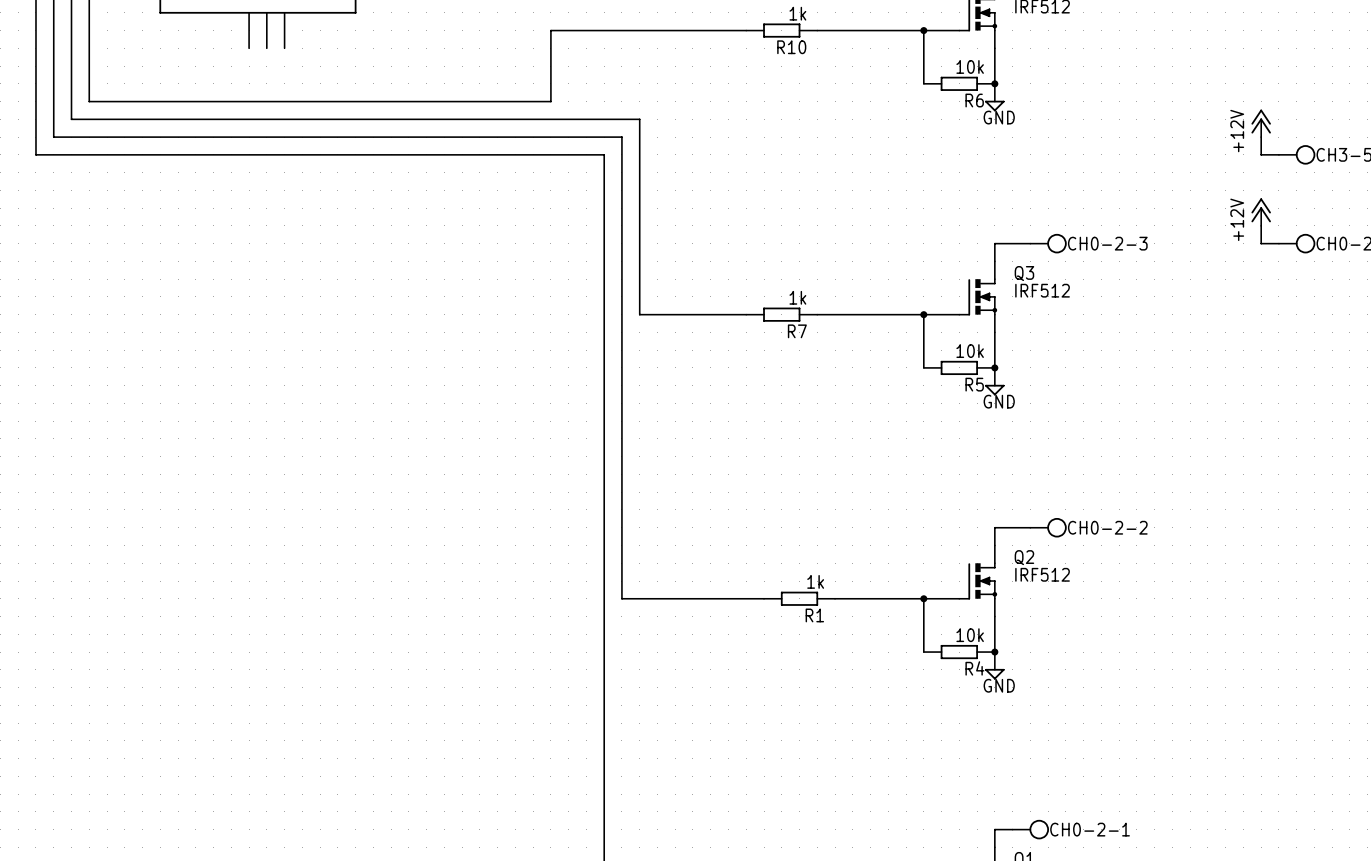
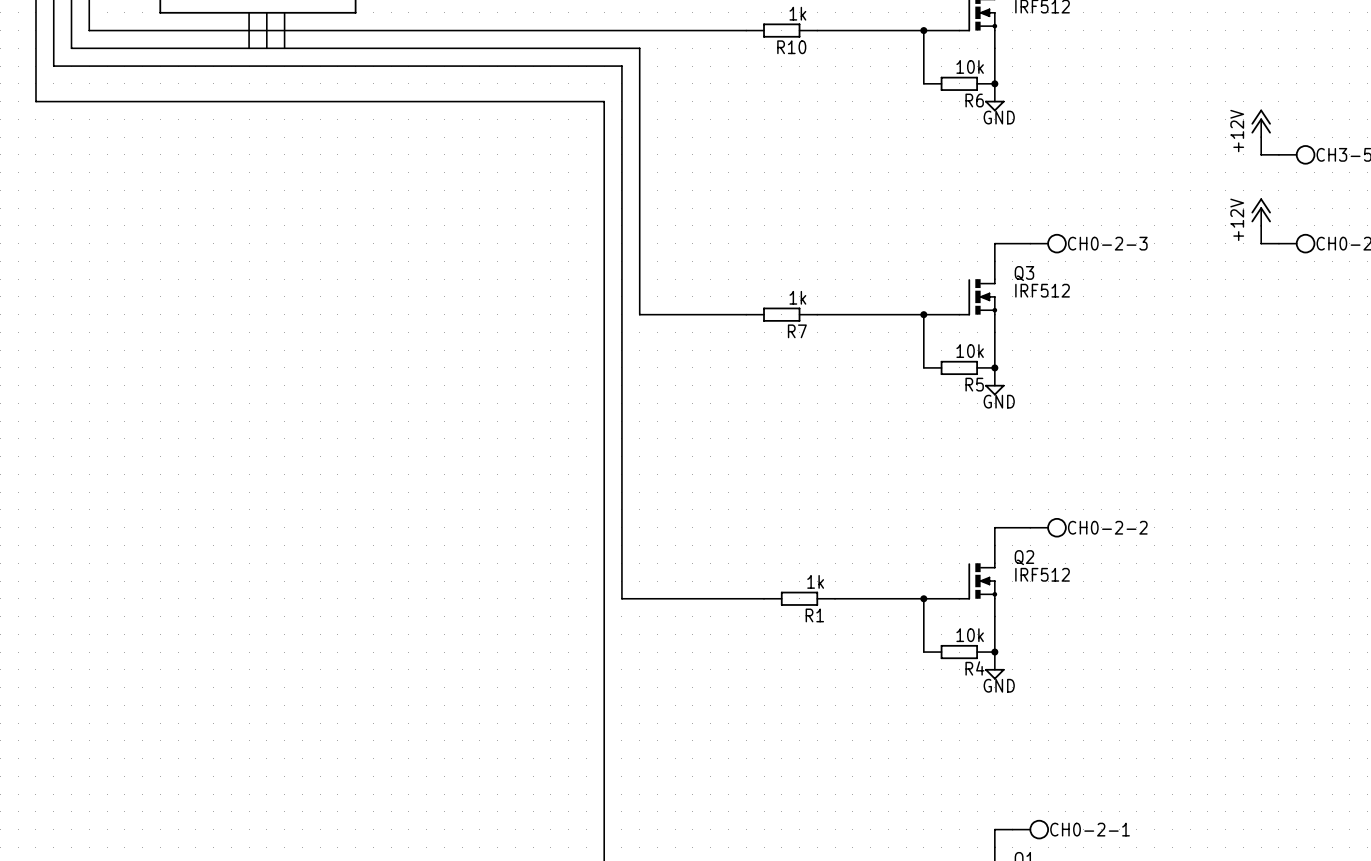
wire: (89, 30) (89, 101) -> (35, 101) (89, 101)
wire: none -> (89, 30) (550, 30)
wire: (550, 30) (550, 101) -> (604, 154) (604, 101) (550, 101)
wire: (71, 48) (71, 119) (639, 119) -> (71, 48) (639, 48) (639, 119)
wire: (53, 66) (53, 137) (621, 137) -> (53, 66) (621, 66) (621, 137)
wire: (35, 101) (35, 154) (604, 154) -> none

